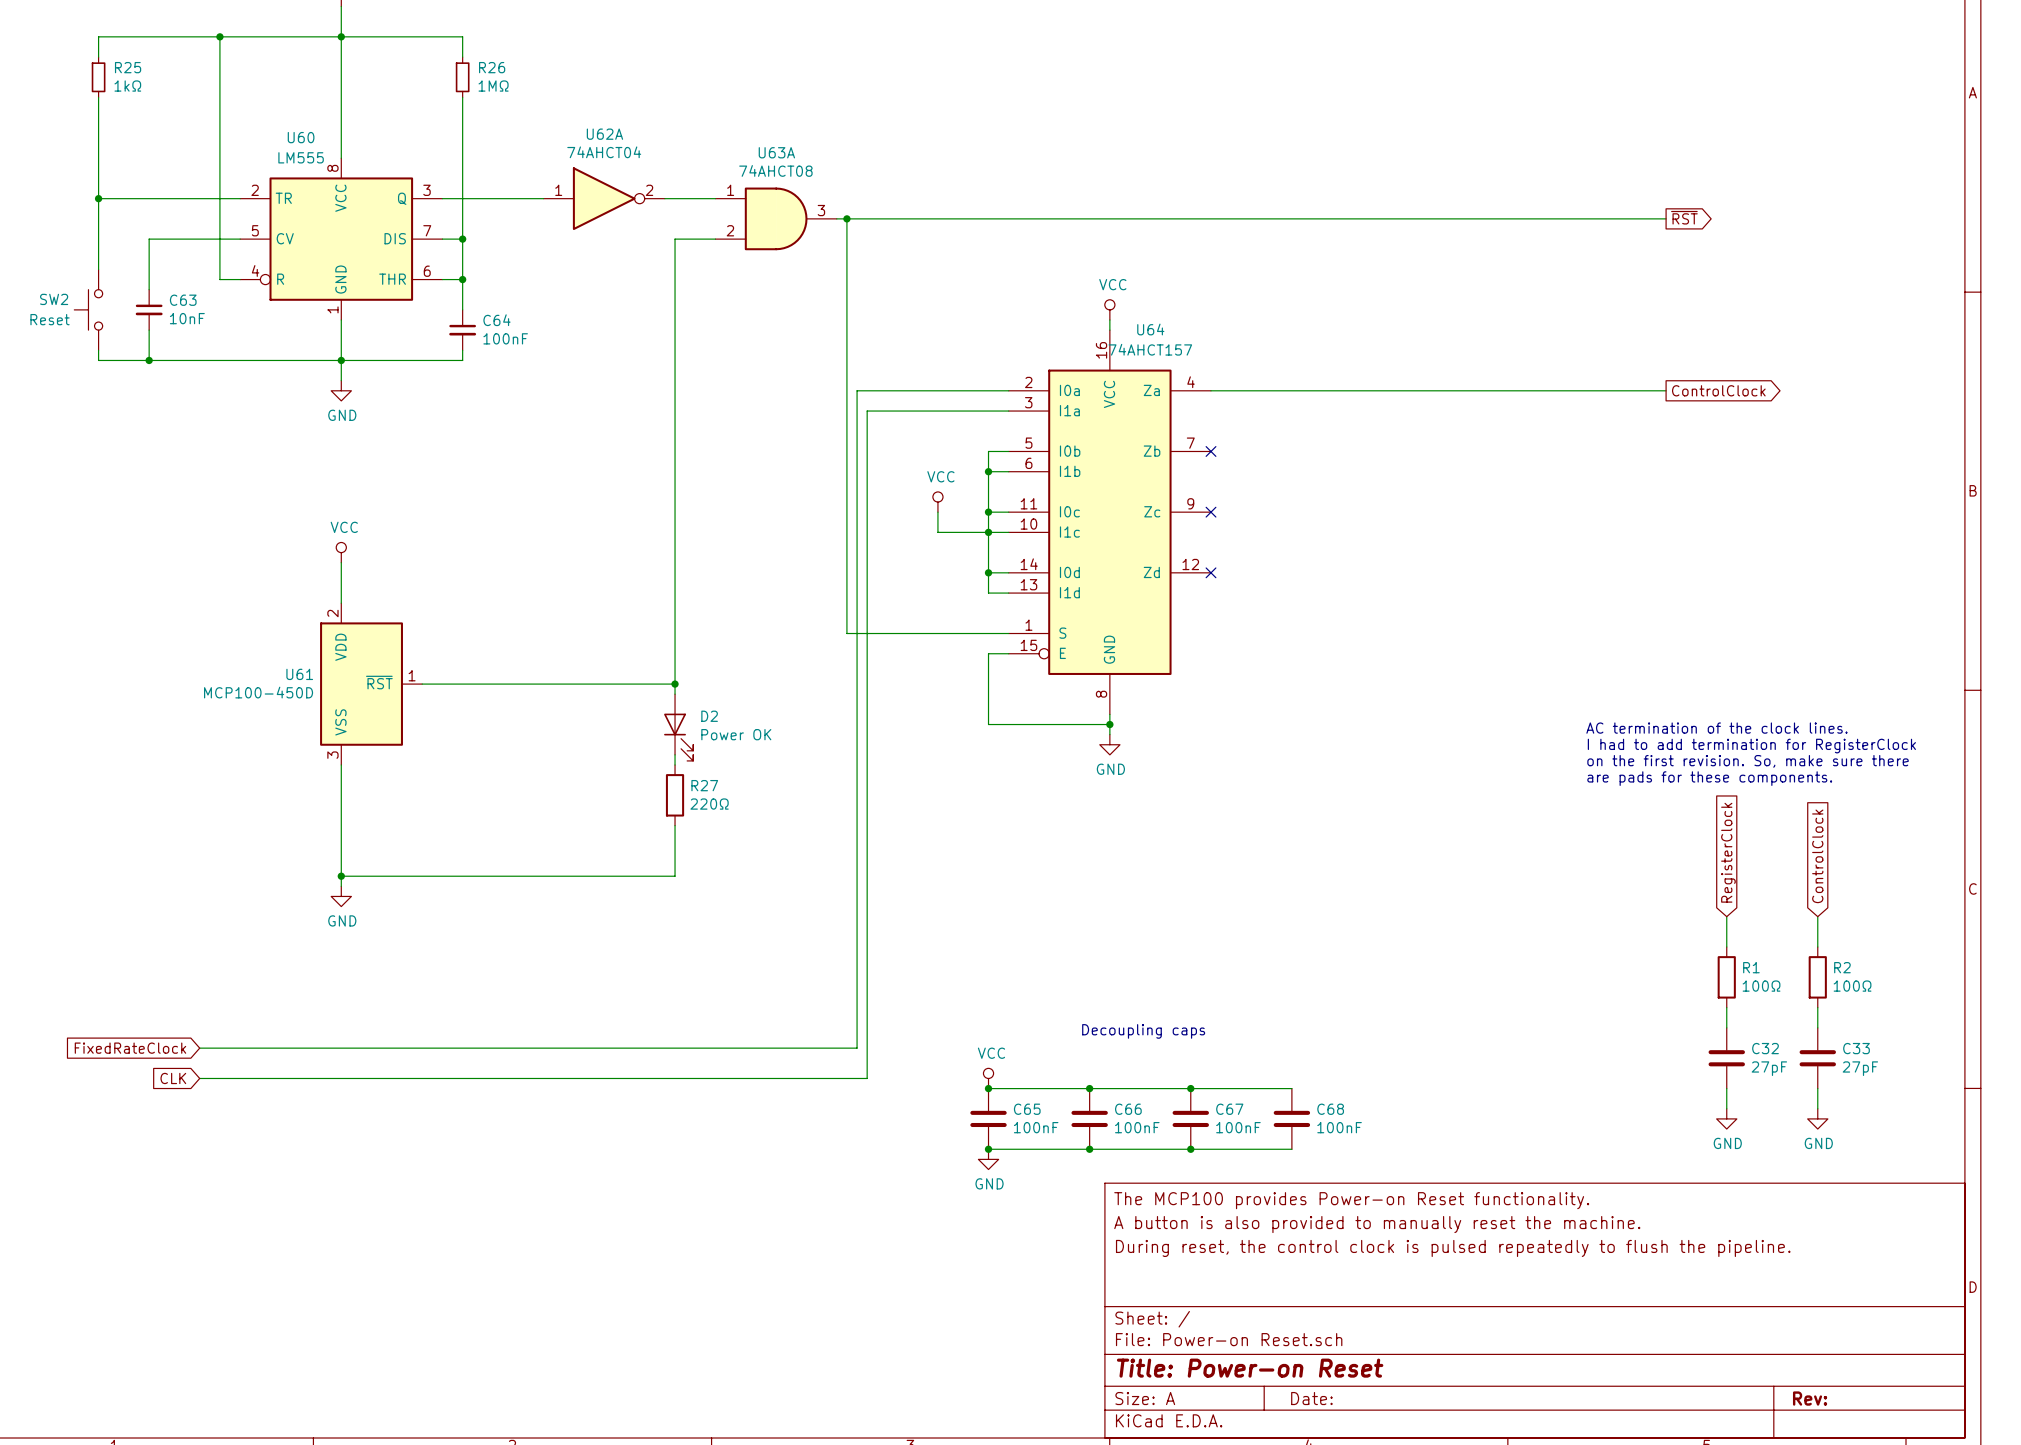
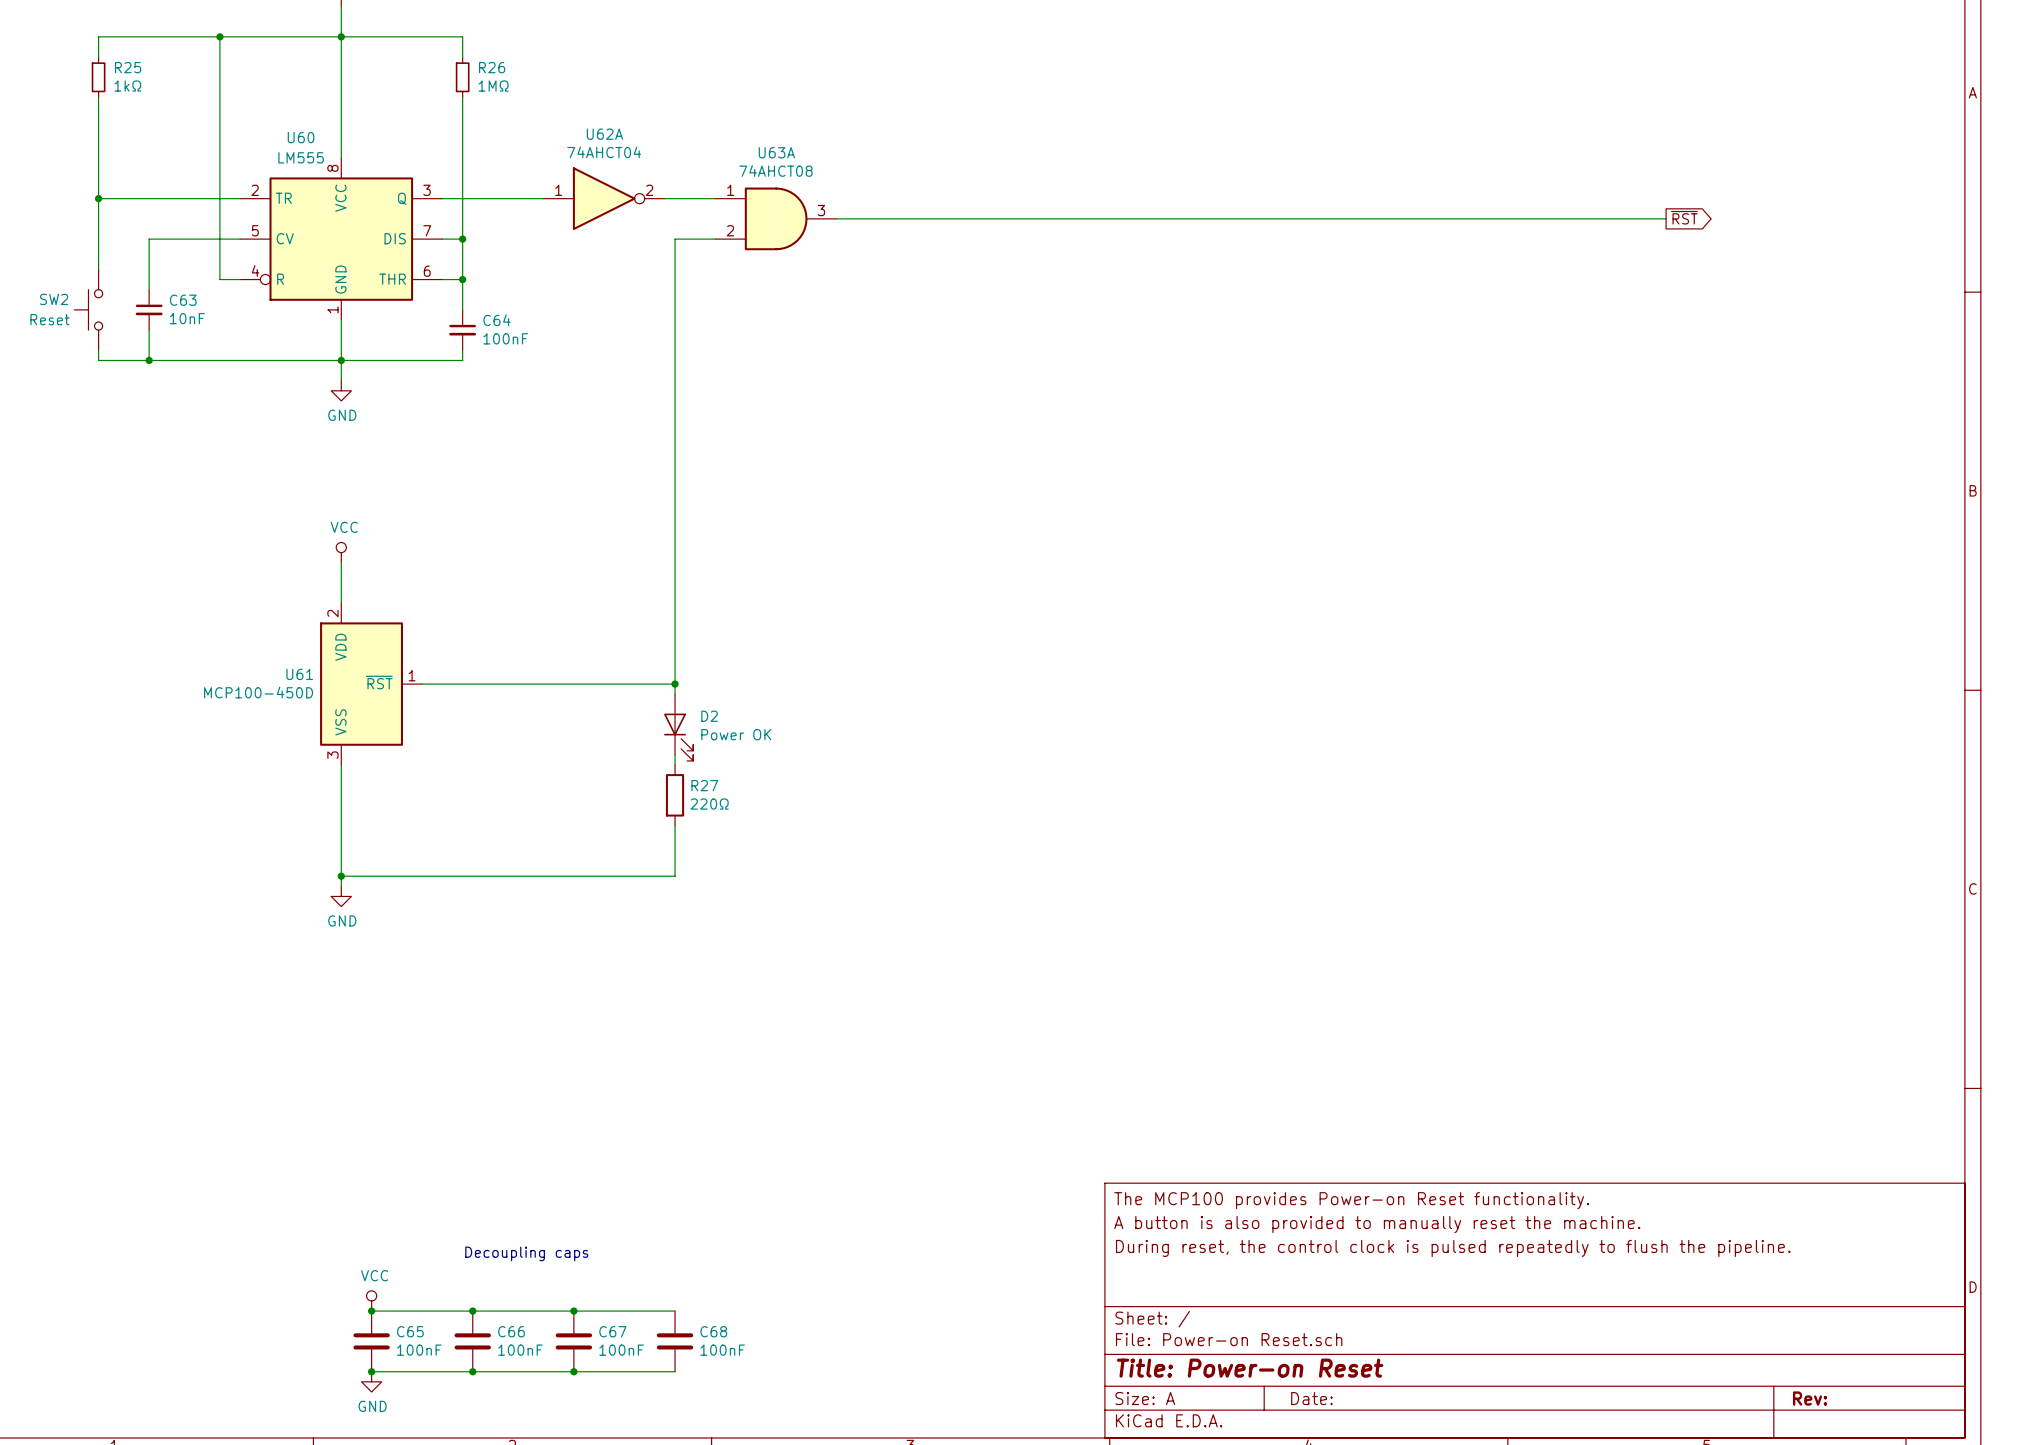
wire: (846, 218) (846, 633) (1008, 633) -> none
junction: (846, 218) -> none
power symbol: VCC (1109, 309) -> none
wire: (1109, 320) (1109, 330) -> none
wire: (1008, 390) (857, 390) (857, 1048) (199, 1048) -> none
wire: (1211, 390) (1666, 390) -> none
global label: ControlClock (1718, 390) -> none
wire: (1008, 411) (867, 411) (867, 1078) (199, 1078) -> none
wire: (1008, 451) (988, 451) (988, 593) (1008, 593) -> none
no-connect mark: (1211, 451) -> none
wire: (988, 471) (1008, 471) -> none
junction: (988, 471) -> none
power symbol: VCC (937, 502) -> none
wire: (937, 512) (937, 532) (1008, 532) -> none
wire: (988, 512) (1008, 512) -> none
junction: (988, 512) -> none
no-connect mark: (1211, 512) -> none
U64: 74AHCT157 (1109, 522) -> none
junction: (988, 532) -> none
wire: (988, 572) (1008, 572) -> none
junction: (988, 572) -> none
no-connect mark: (1211, 572) -> none
wire: (1008, 653) (988, 653) (988, 724) (1109, 724) -> none
wire: (1109, 714) (1109, 734) -> none
junction: (1109, 724) -> none
text: AC termination of the clock lines. (1716, 728) -> none
power symbol: GND (1109, 744) -> none
text: I had to add termination for RegisterClock (1751, 746) -> none
text: on the first revision. So, make sure there (1748, 761) -> none
text: are pads for these components. (1709, 778) -> none
global label: RegisterClock (1728, 852) -> none
global label: ControlClock (1817, 856) -> none
wire: (1726, 916) (1726, 947) -> none
wire: (1817, 916) (1817, 947) -> none
R1: 100Ω (1726, 977) -> none
R2: 100Ω (1817, 977) -> none
wire: (1726, 1007) (1726, 1027) -> none
wire: (1817, 1007) (1817, 1027) -> none
text: Decoupling caps (1143, 1031) -> none
global label: FixedRateClock (130, 1048) -> none
C32: 27pF (1726, 1058) -> none
C33: 27pF (1817, 1058) -> none
global label: CLK (173, 1078) -> none
power symbol: VCC (988, 1078) -> none
wire: (988, 1088) (1291, 1088) -> none
junction: (988, 1088) -> none
junction: (1089, 1088) -> none
junction: (1190, 1088) -> none
wire: (1726, 1088) (1726, 1108) -> none
wire: (1817, 1088) (1817, 1108) -> none
C65 position: (988, 1118) -> (371, 1341)
C66 position: (1089, 1118) -> (472, 1341)
C67 position: (1190, 1118) -> (573, 1341)
C68 position: (1291, 1118) -> (675, 1341)
power symbol: GND (1726, 1118) -> none
power symbol: GND (1817, 1118) -> none
wire: (988, 1149) (1291, 1149) -> none
junction: (988, 1149) -> none
junction: (1089, 1149) -> none
junction: (1190, 1149) -> none
power symbol: GND (988, 1159) -> none
text: none -> Decoupling caps (526, 1253)
power symbol: none -> VCC (371, 1300)
wire: none -> (371, 1311) (675, 1311)
junction: none -> (371, 1311)
junction: none -> (472, 1311)
junction: none -> (573, 1311)
wire: none -> (371, 1371) (675, 1371)
junction: none -> (371, 1371)
junction: none -> (472, 1371)
junction: none -> (573, 1371)
power symbol: none -> GND (371, 1381)

